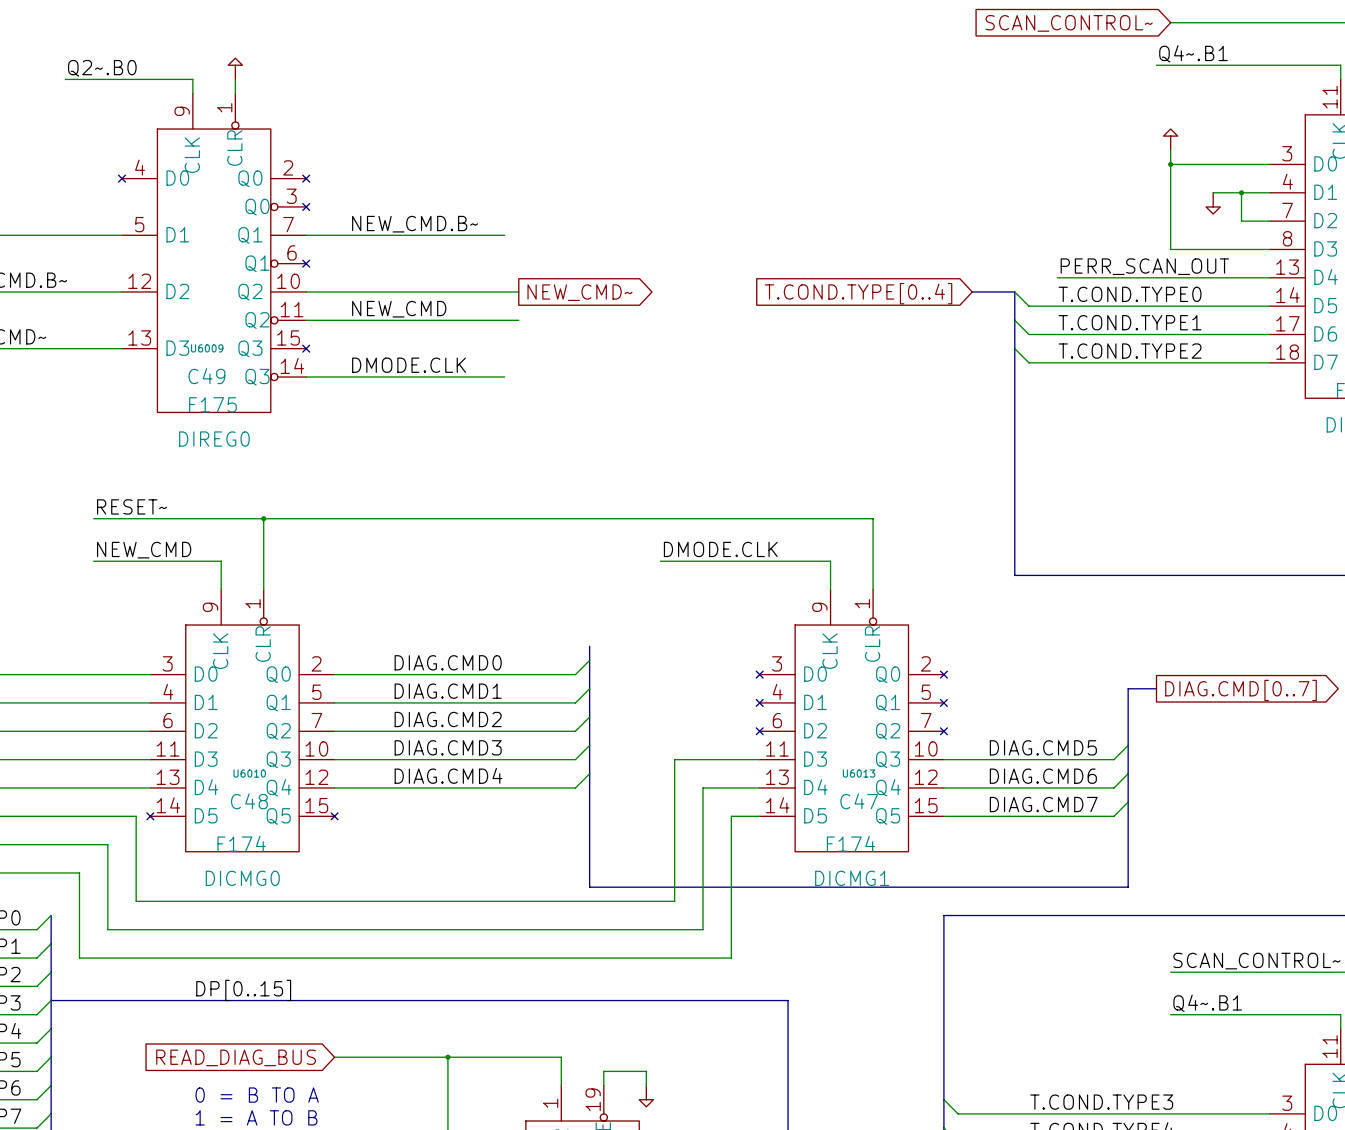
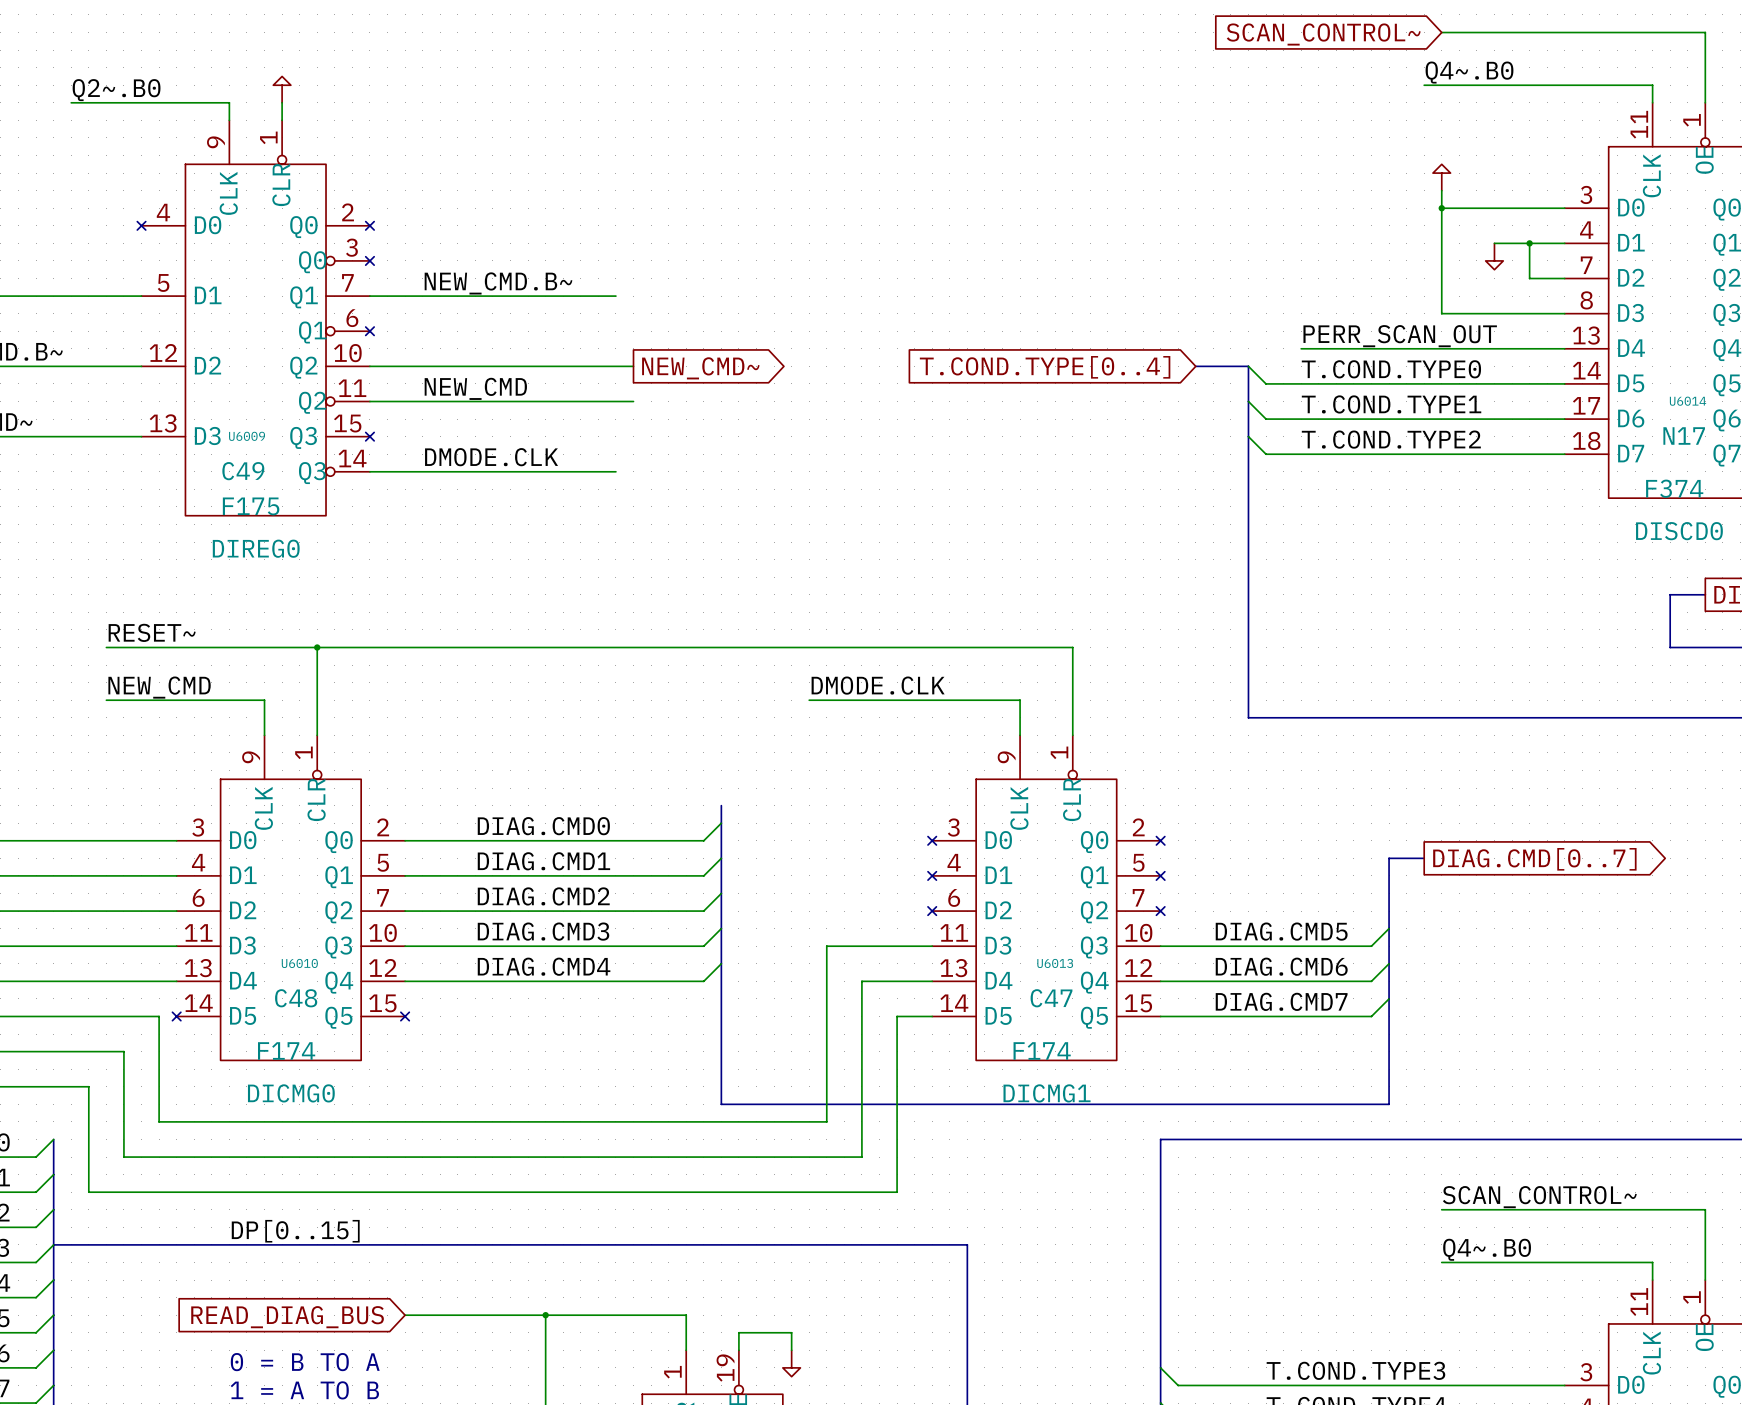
label: Q4~.B1 (1193, 53) -> Q4~.B0 (1469, 72)
label: Q4~.B1 (1207, 1003) -> Q4~.B0 (1487, 1249)

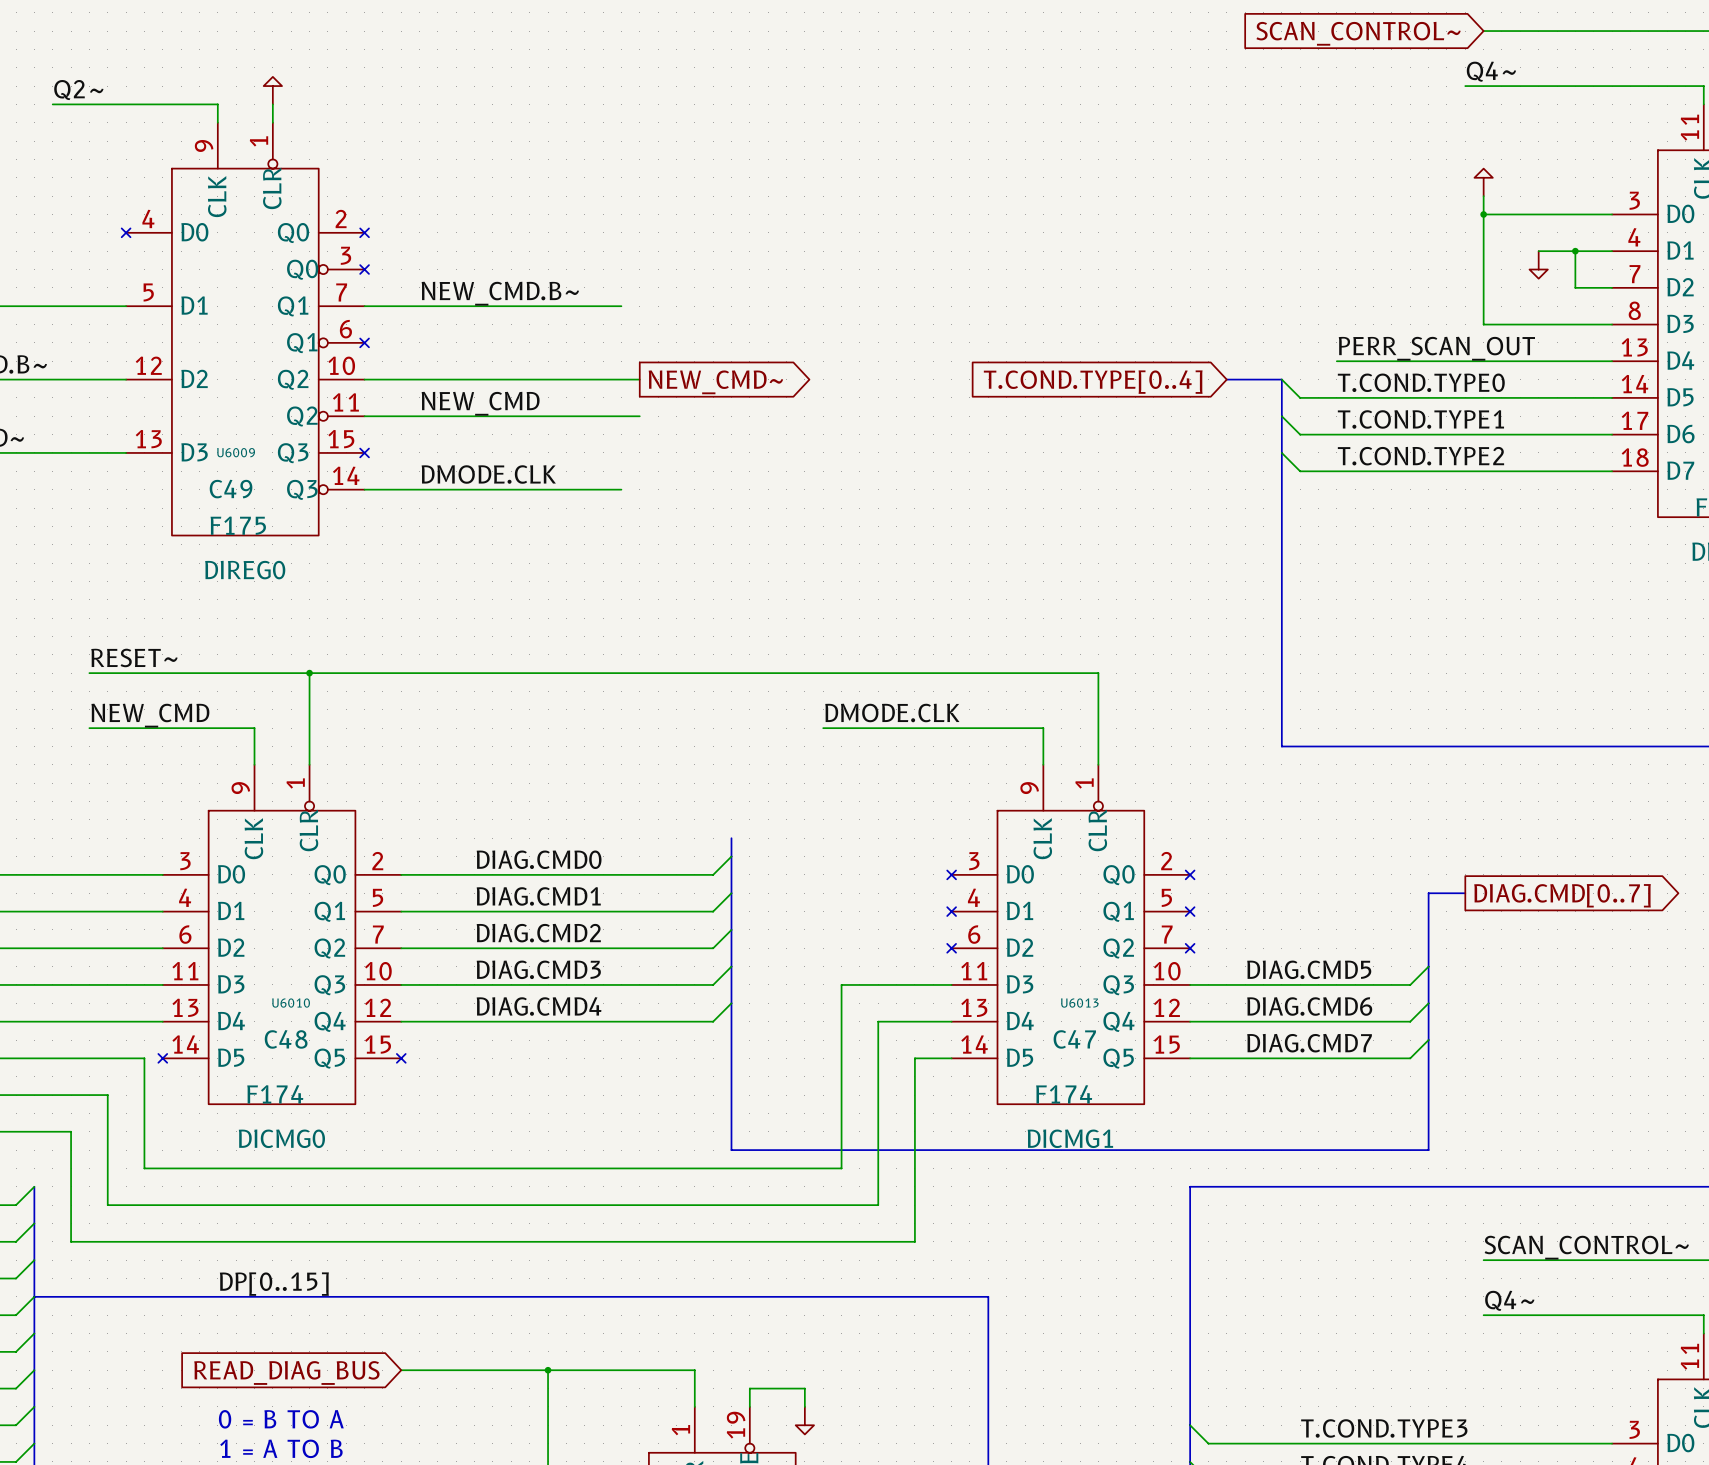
label: Q4~.B0 (1469, 72) -> Q4~ (1491, 71)
label: Q2~.B0 (116, 90) -> Q2~ (78, 90)
label: Q4~.B0 (1487, 1249) -> Q4~ (1509, 1300)

